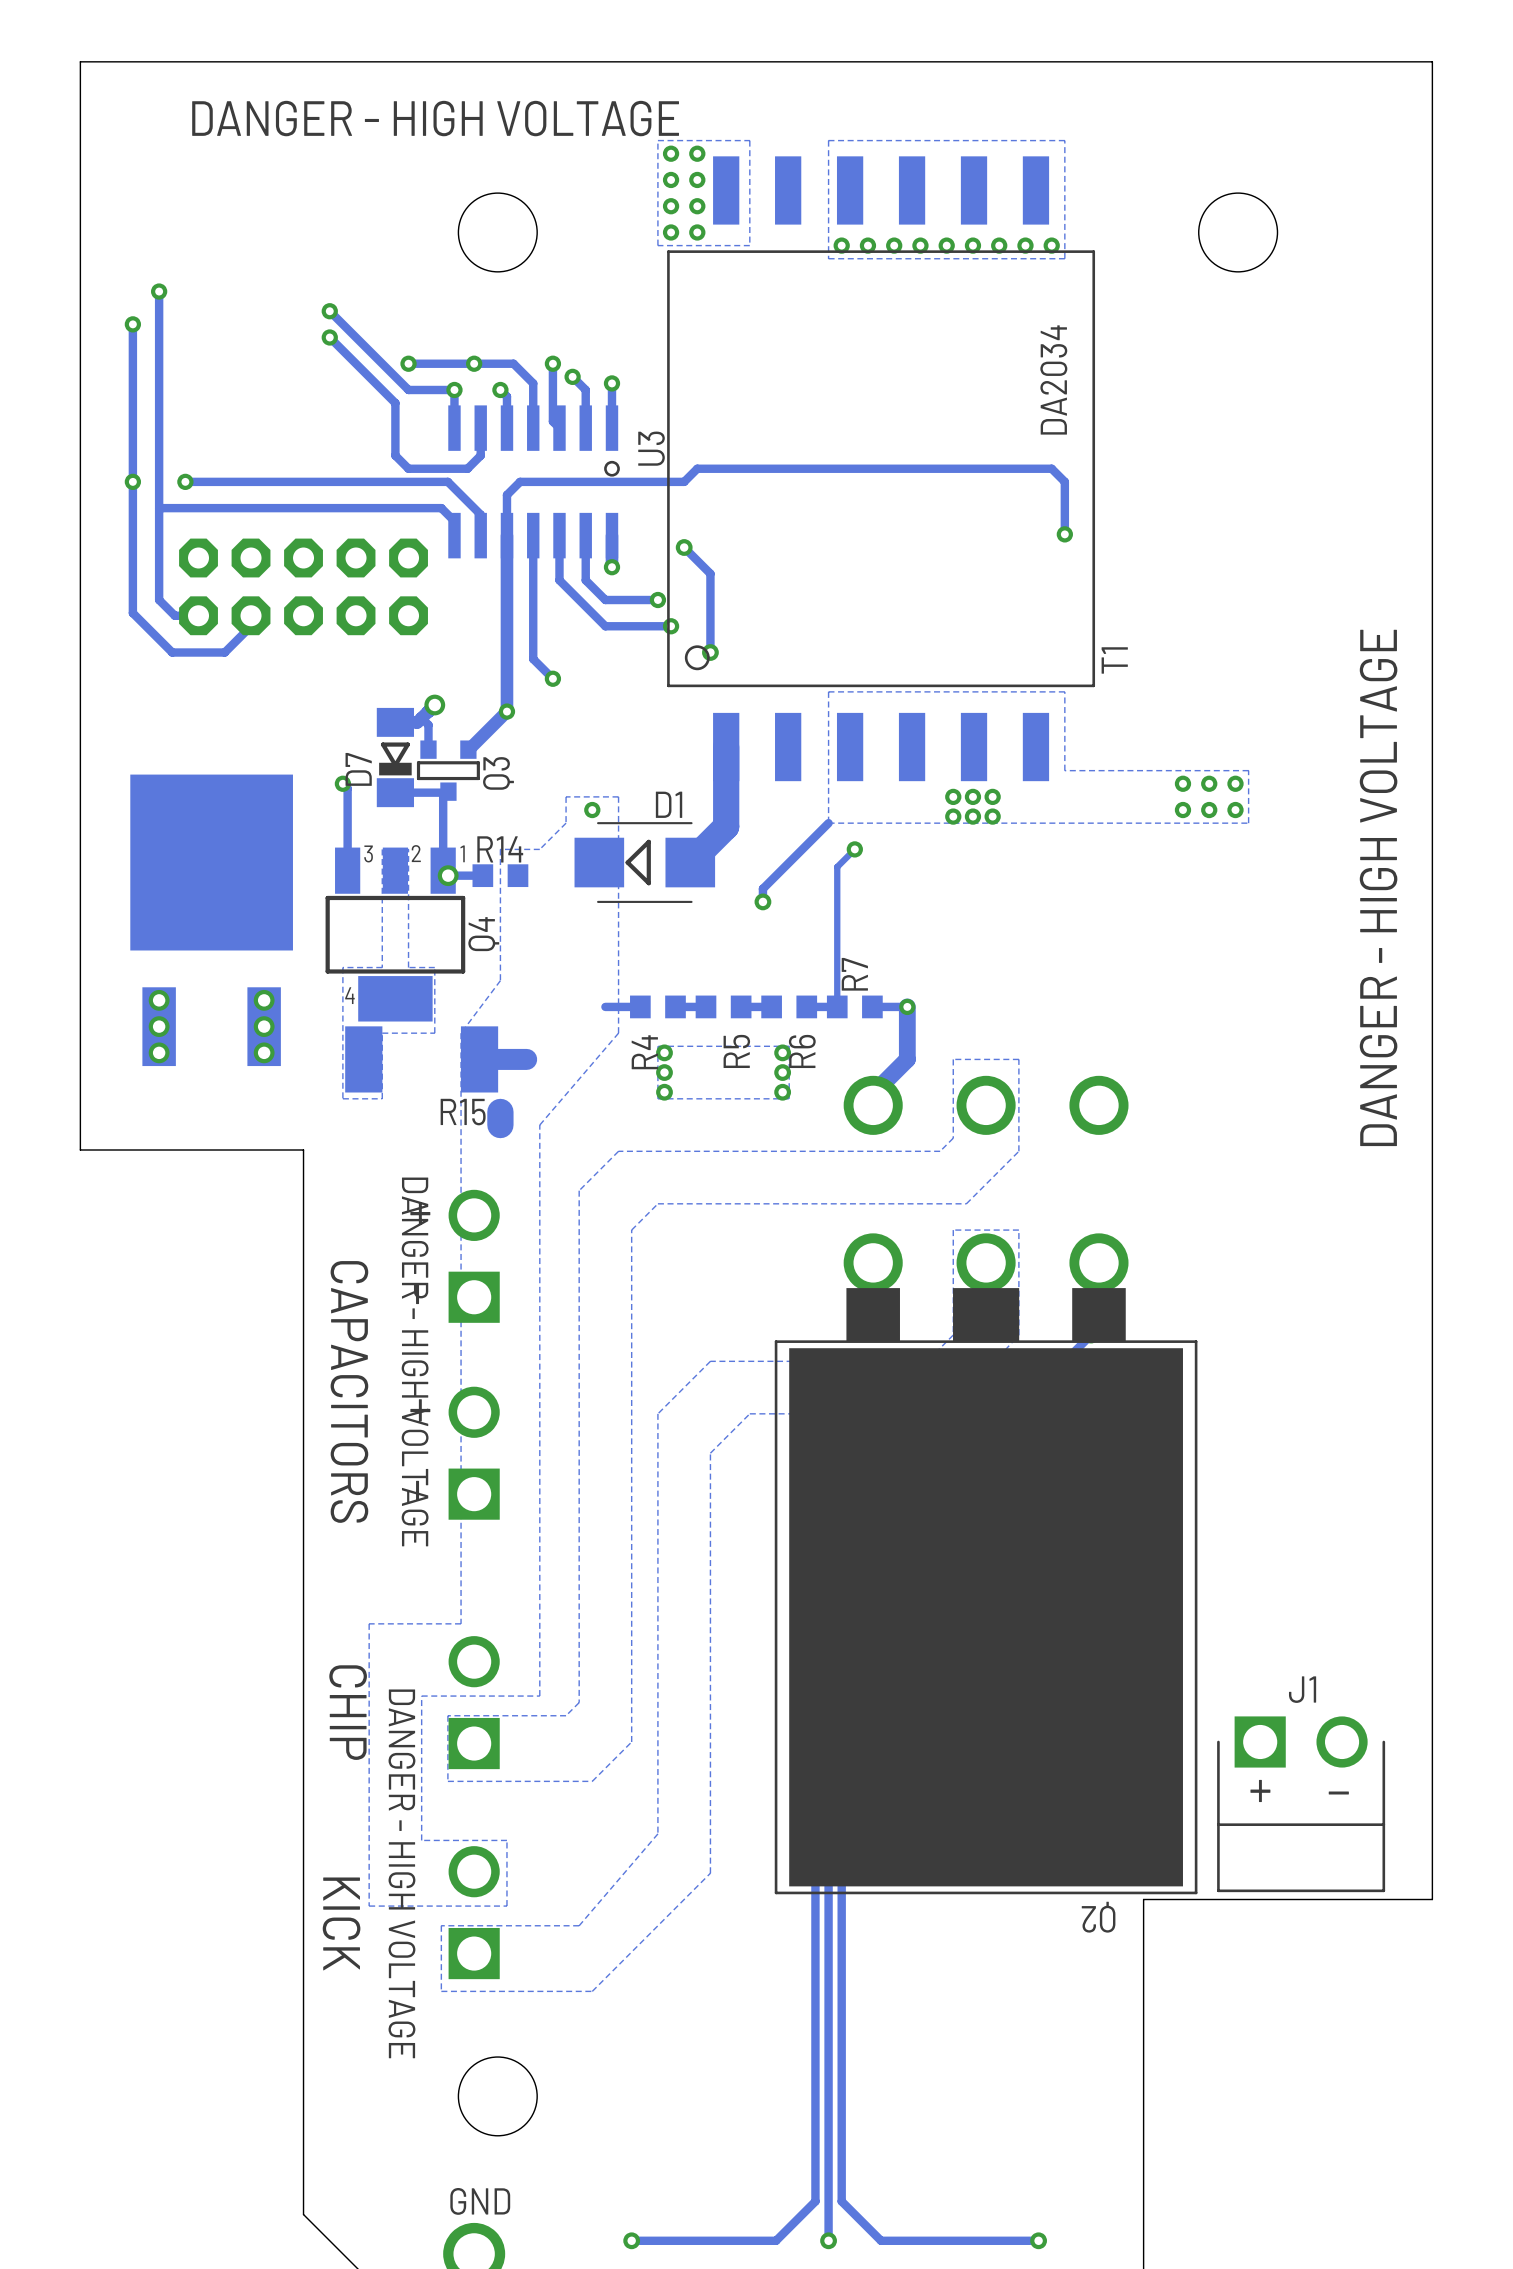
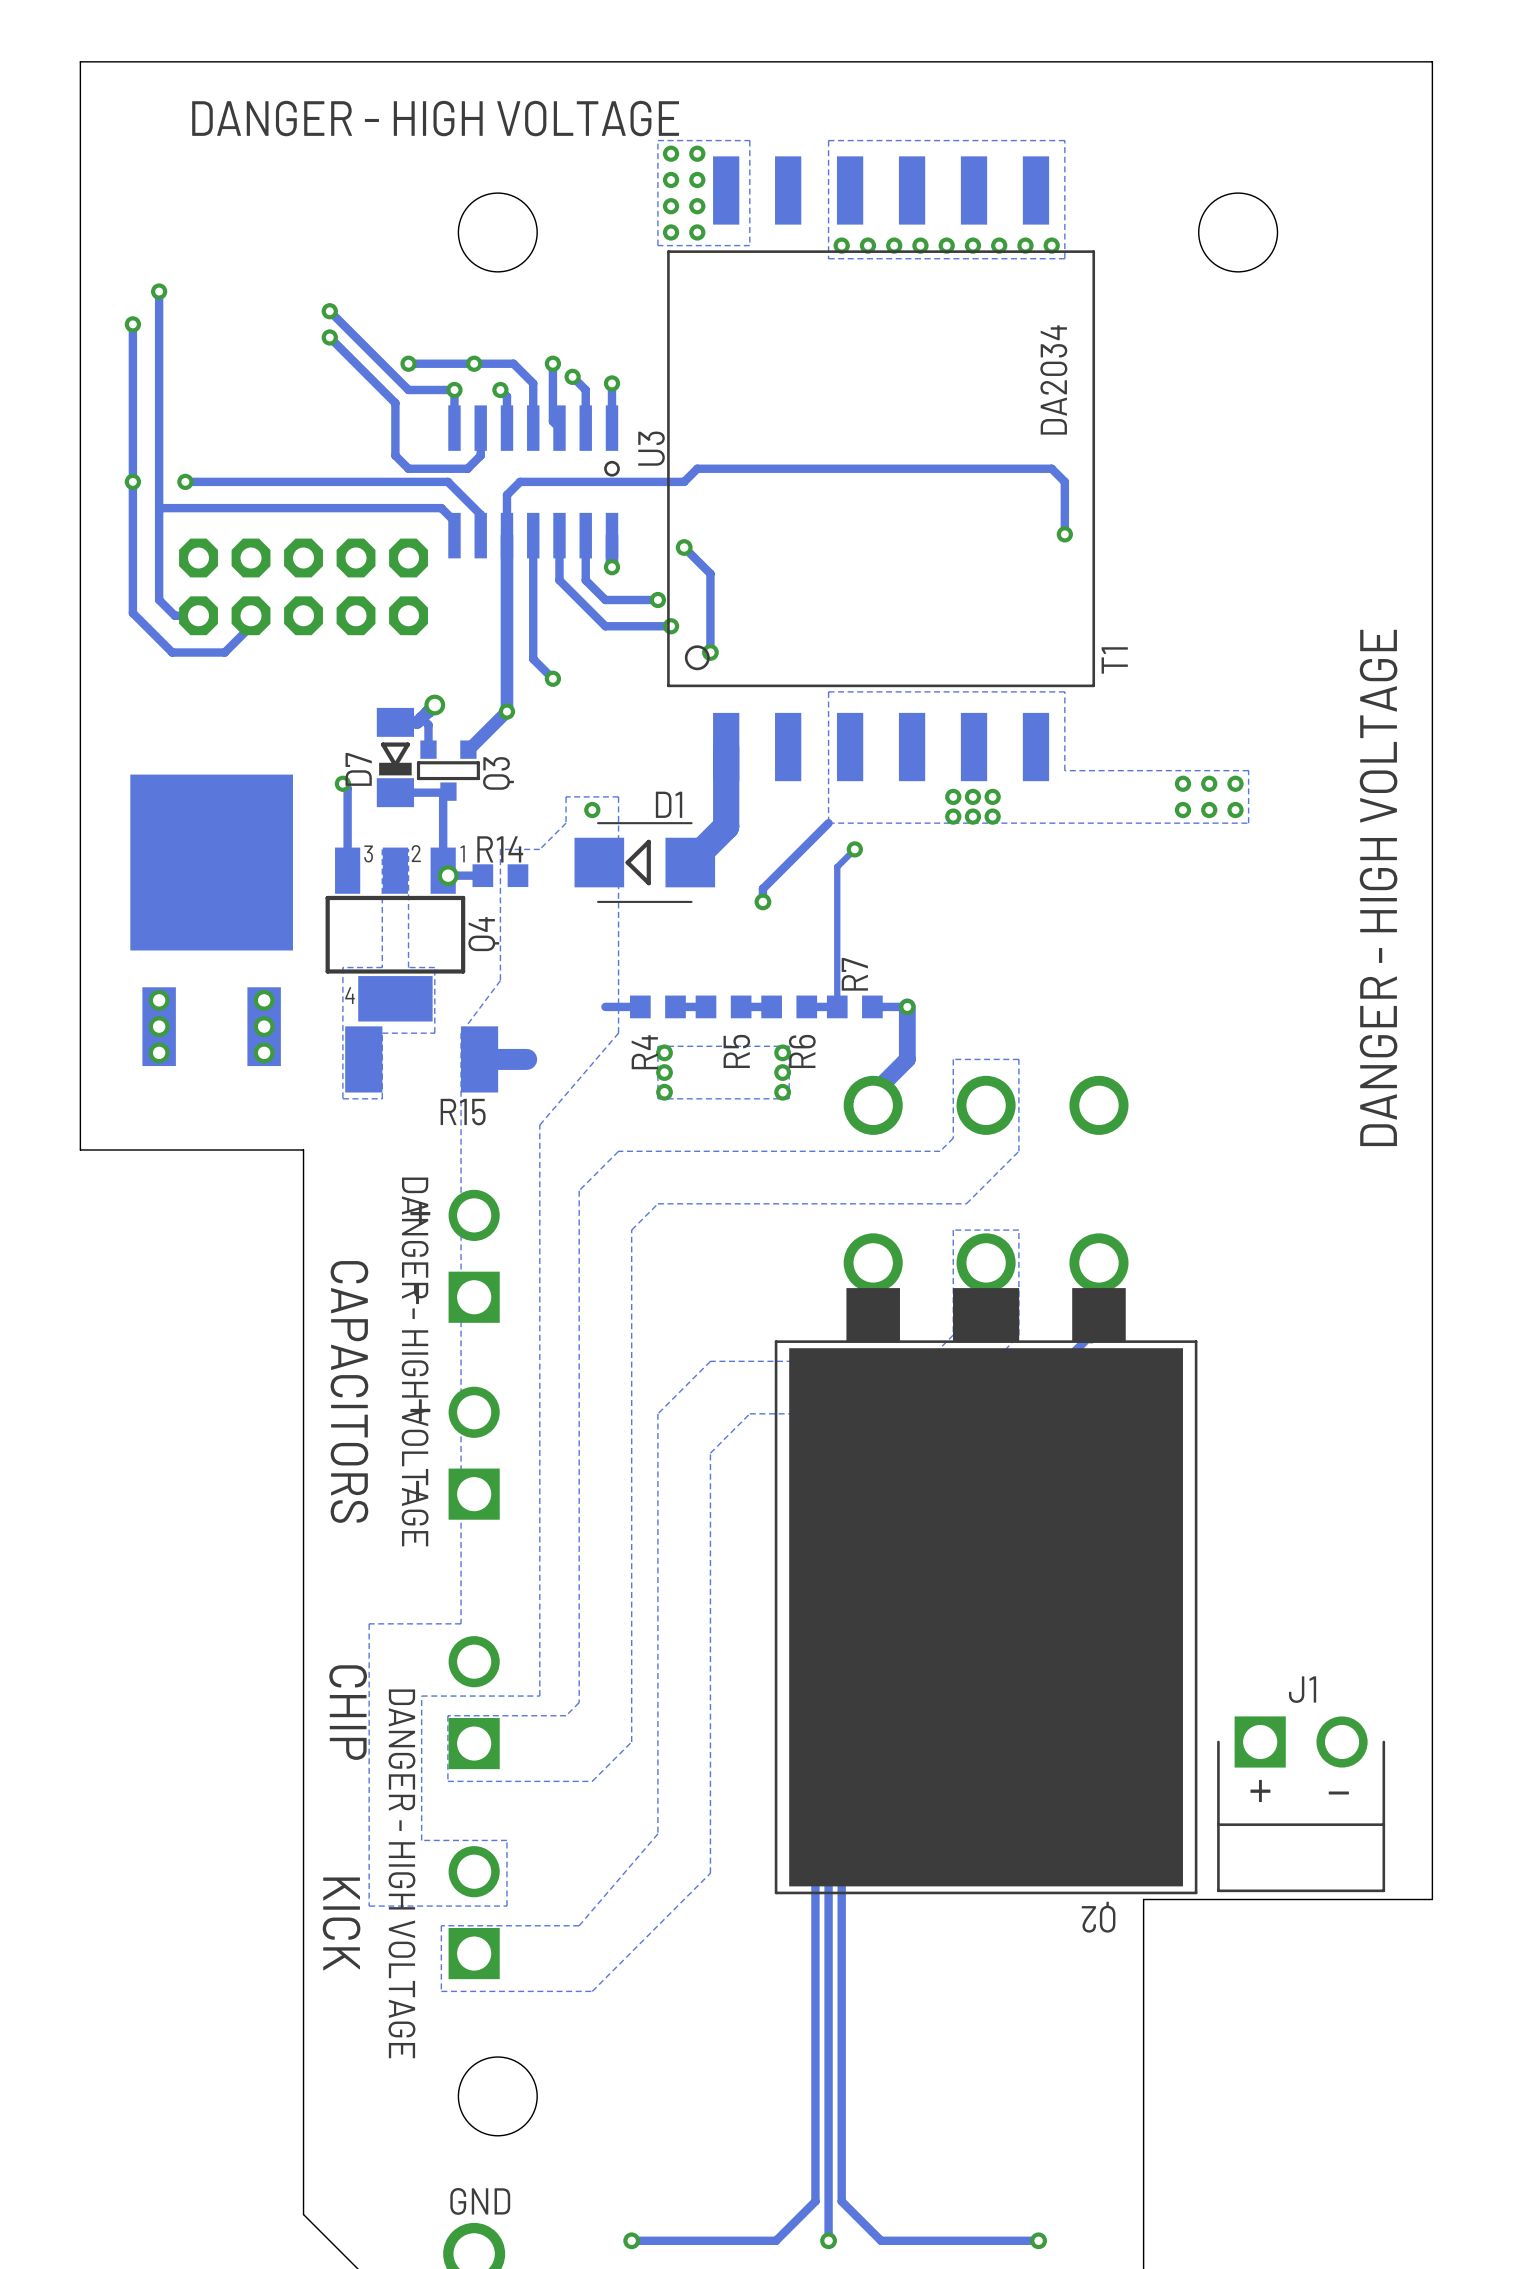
track: (500, 1111) (500, 1125) -> none

